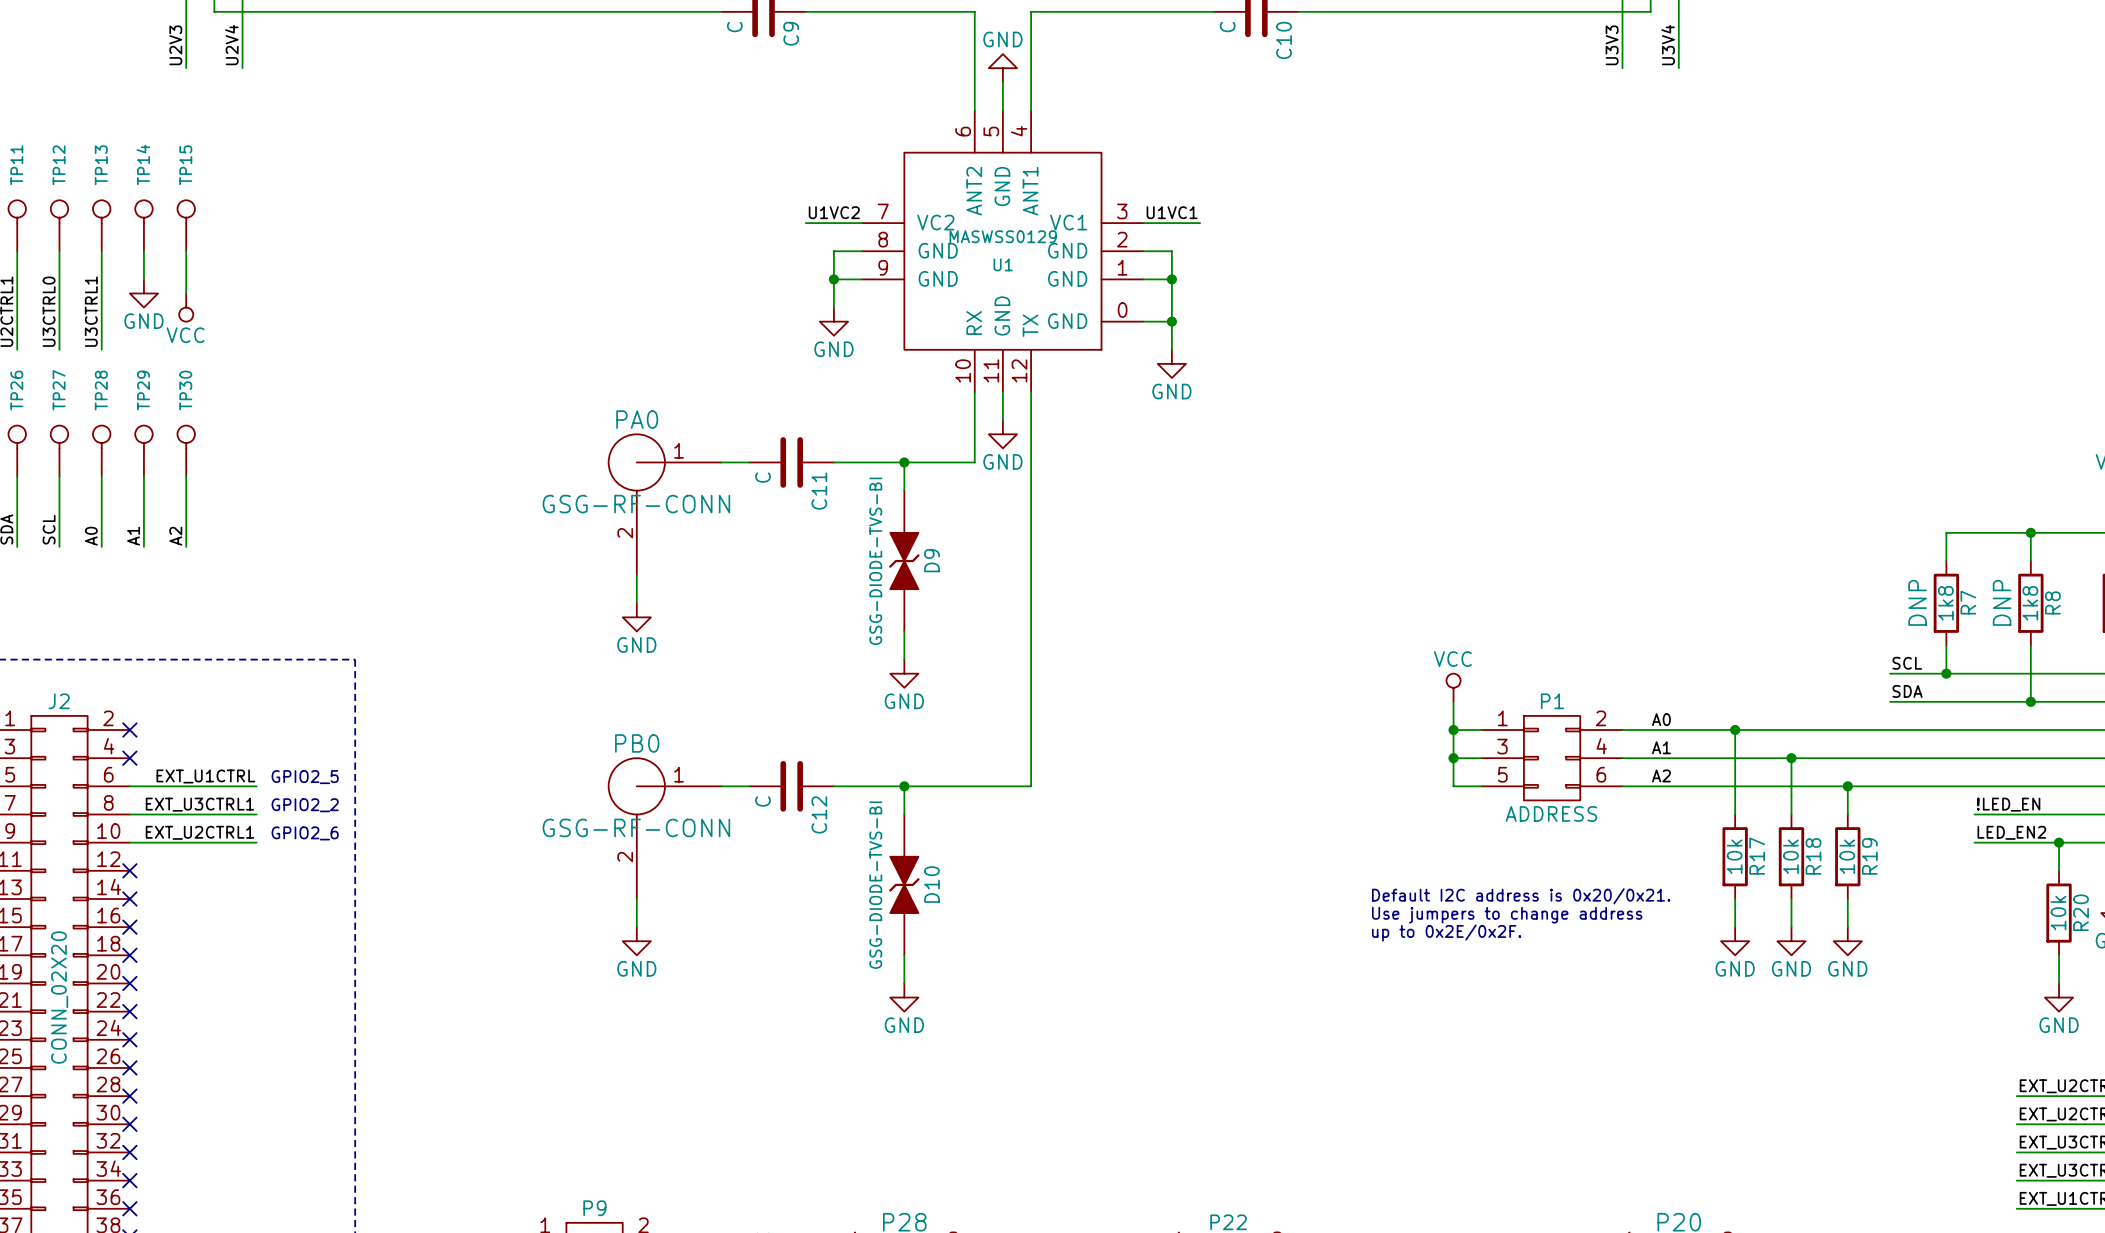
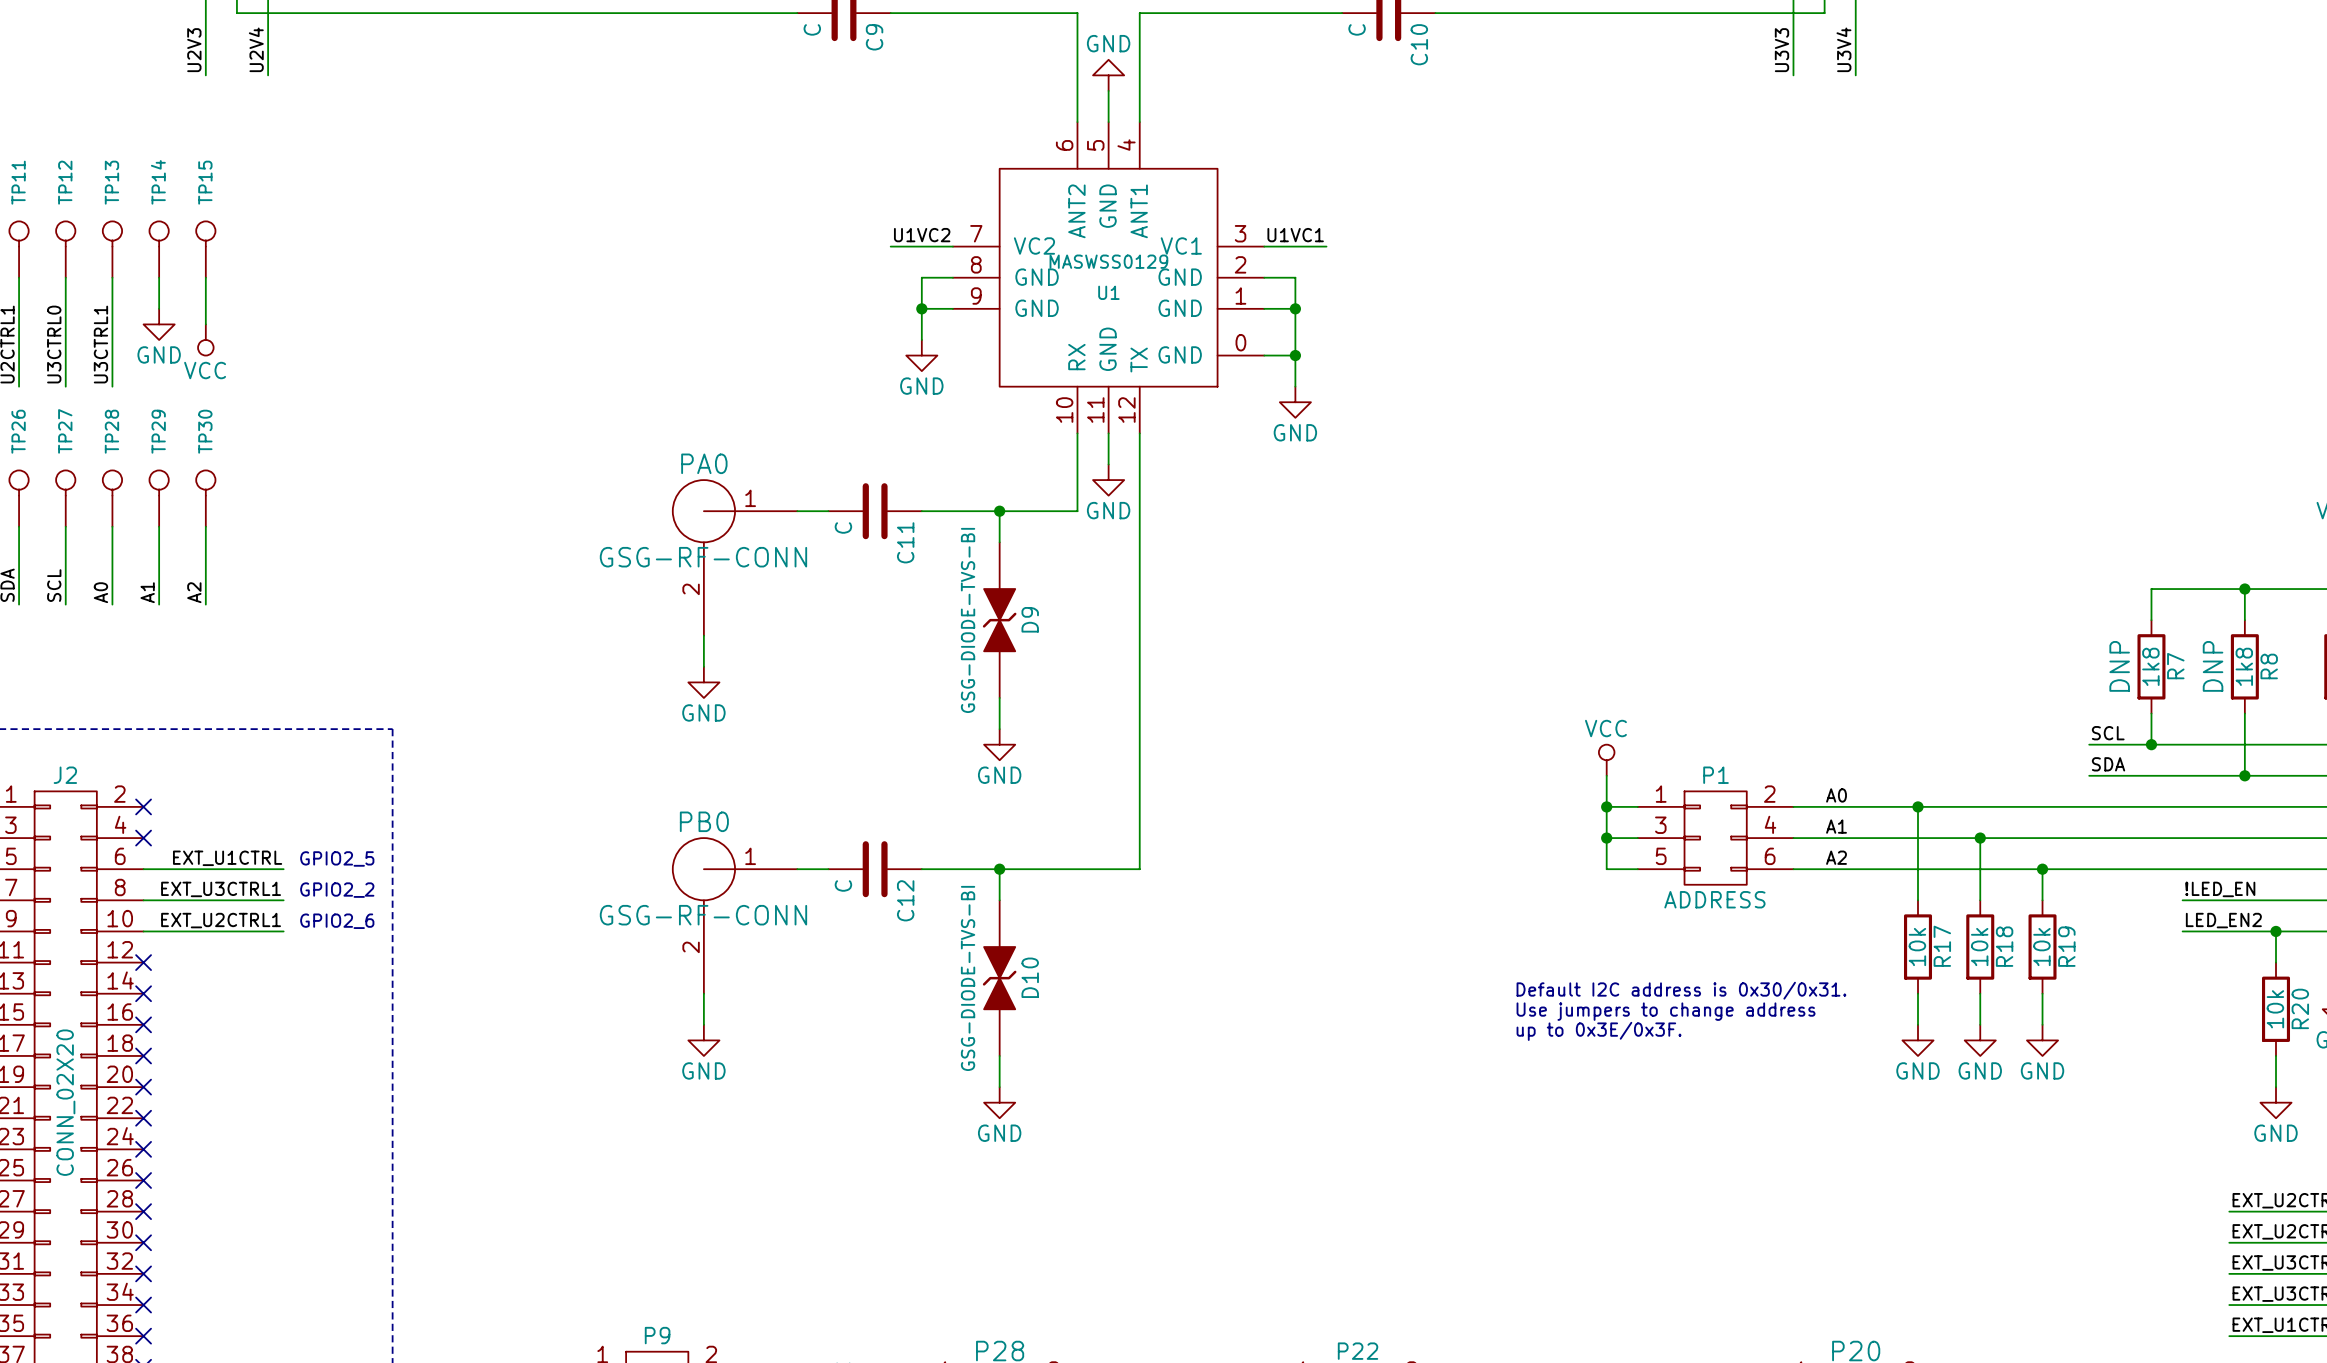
text: Default I2C address is 0x20/0x21. (1521, 896) -> Default I2C address is 0x30/0x31. (1681, 990)
text: up to 0x2E/0x2F. (1446, 933) -> up to 0x3E/0x3F. (1599, 1031)

